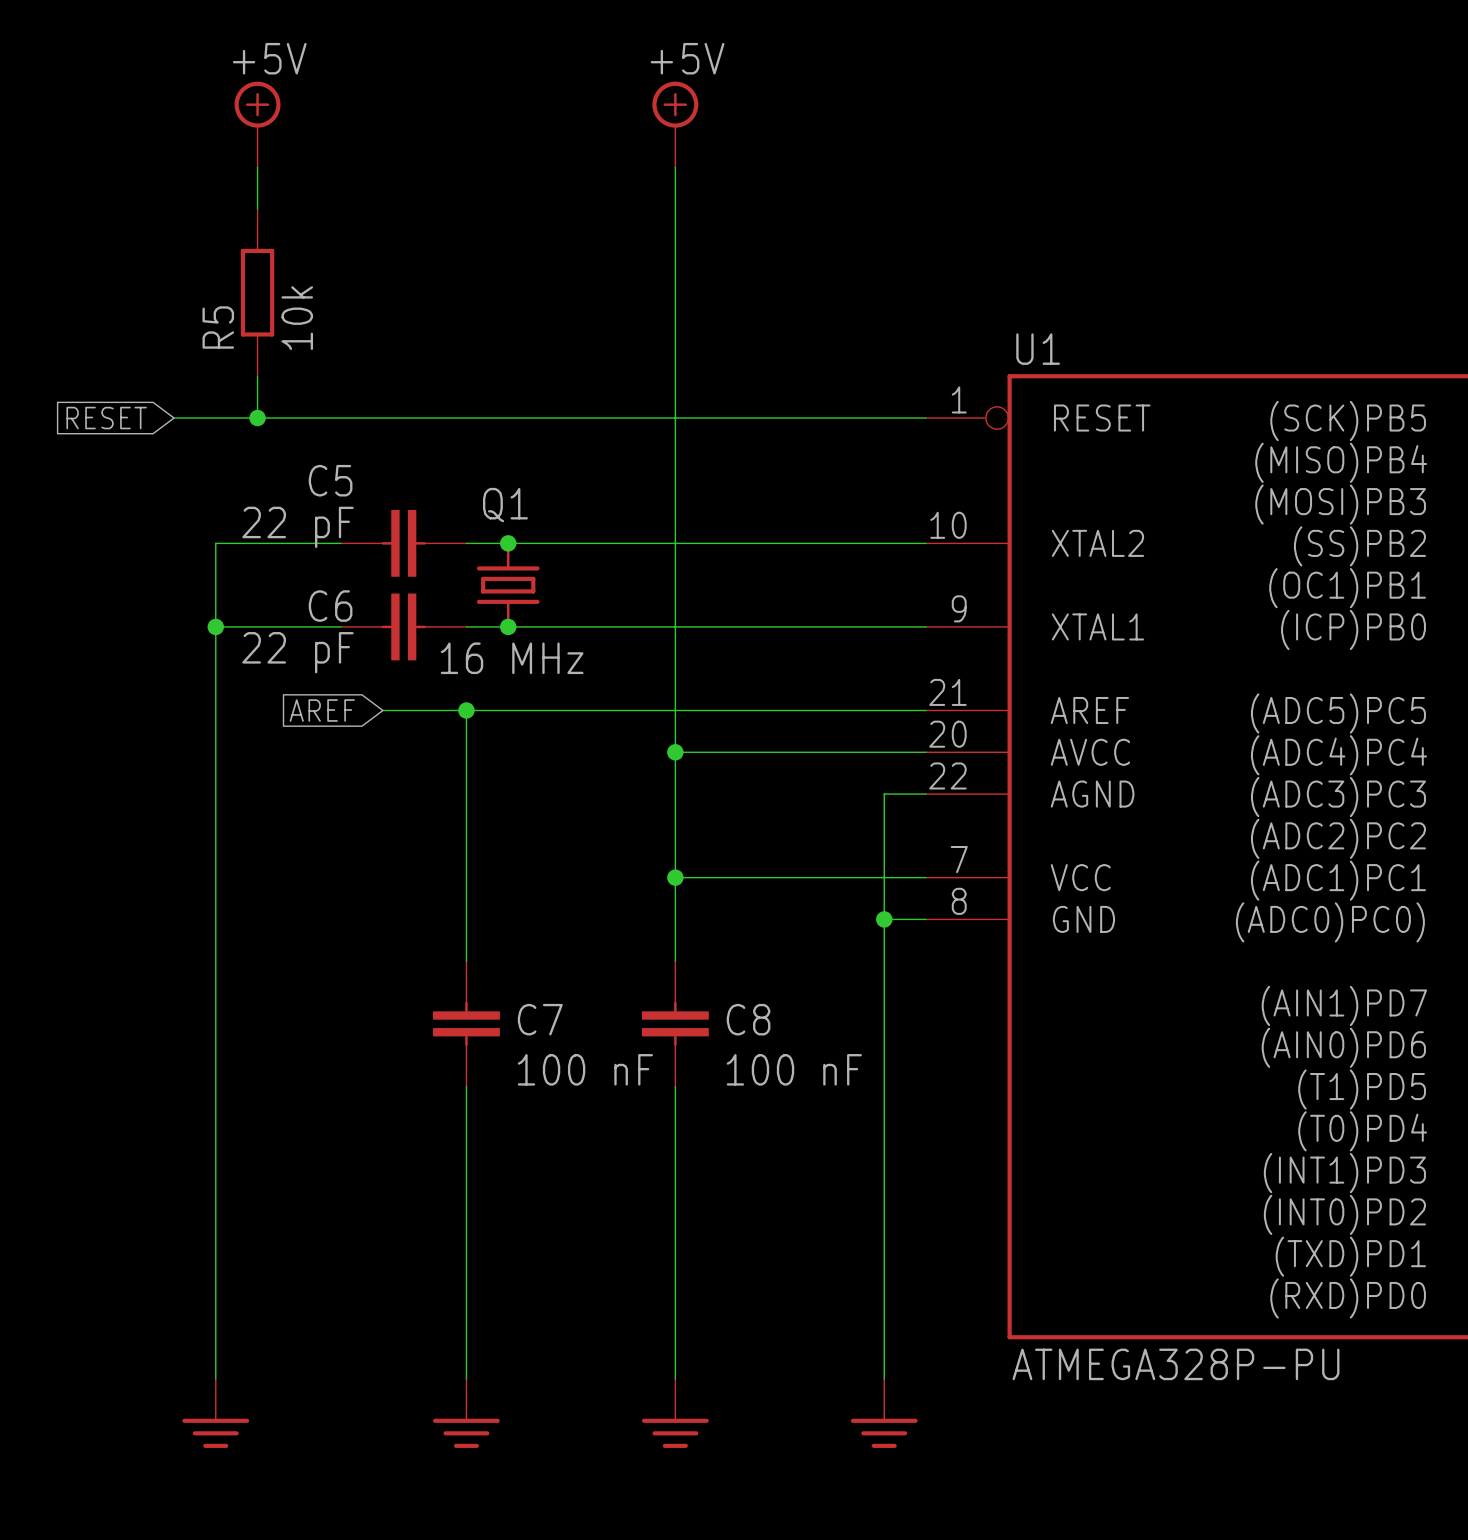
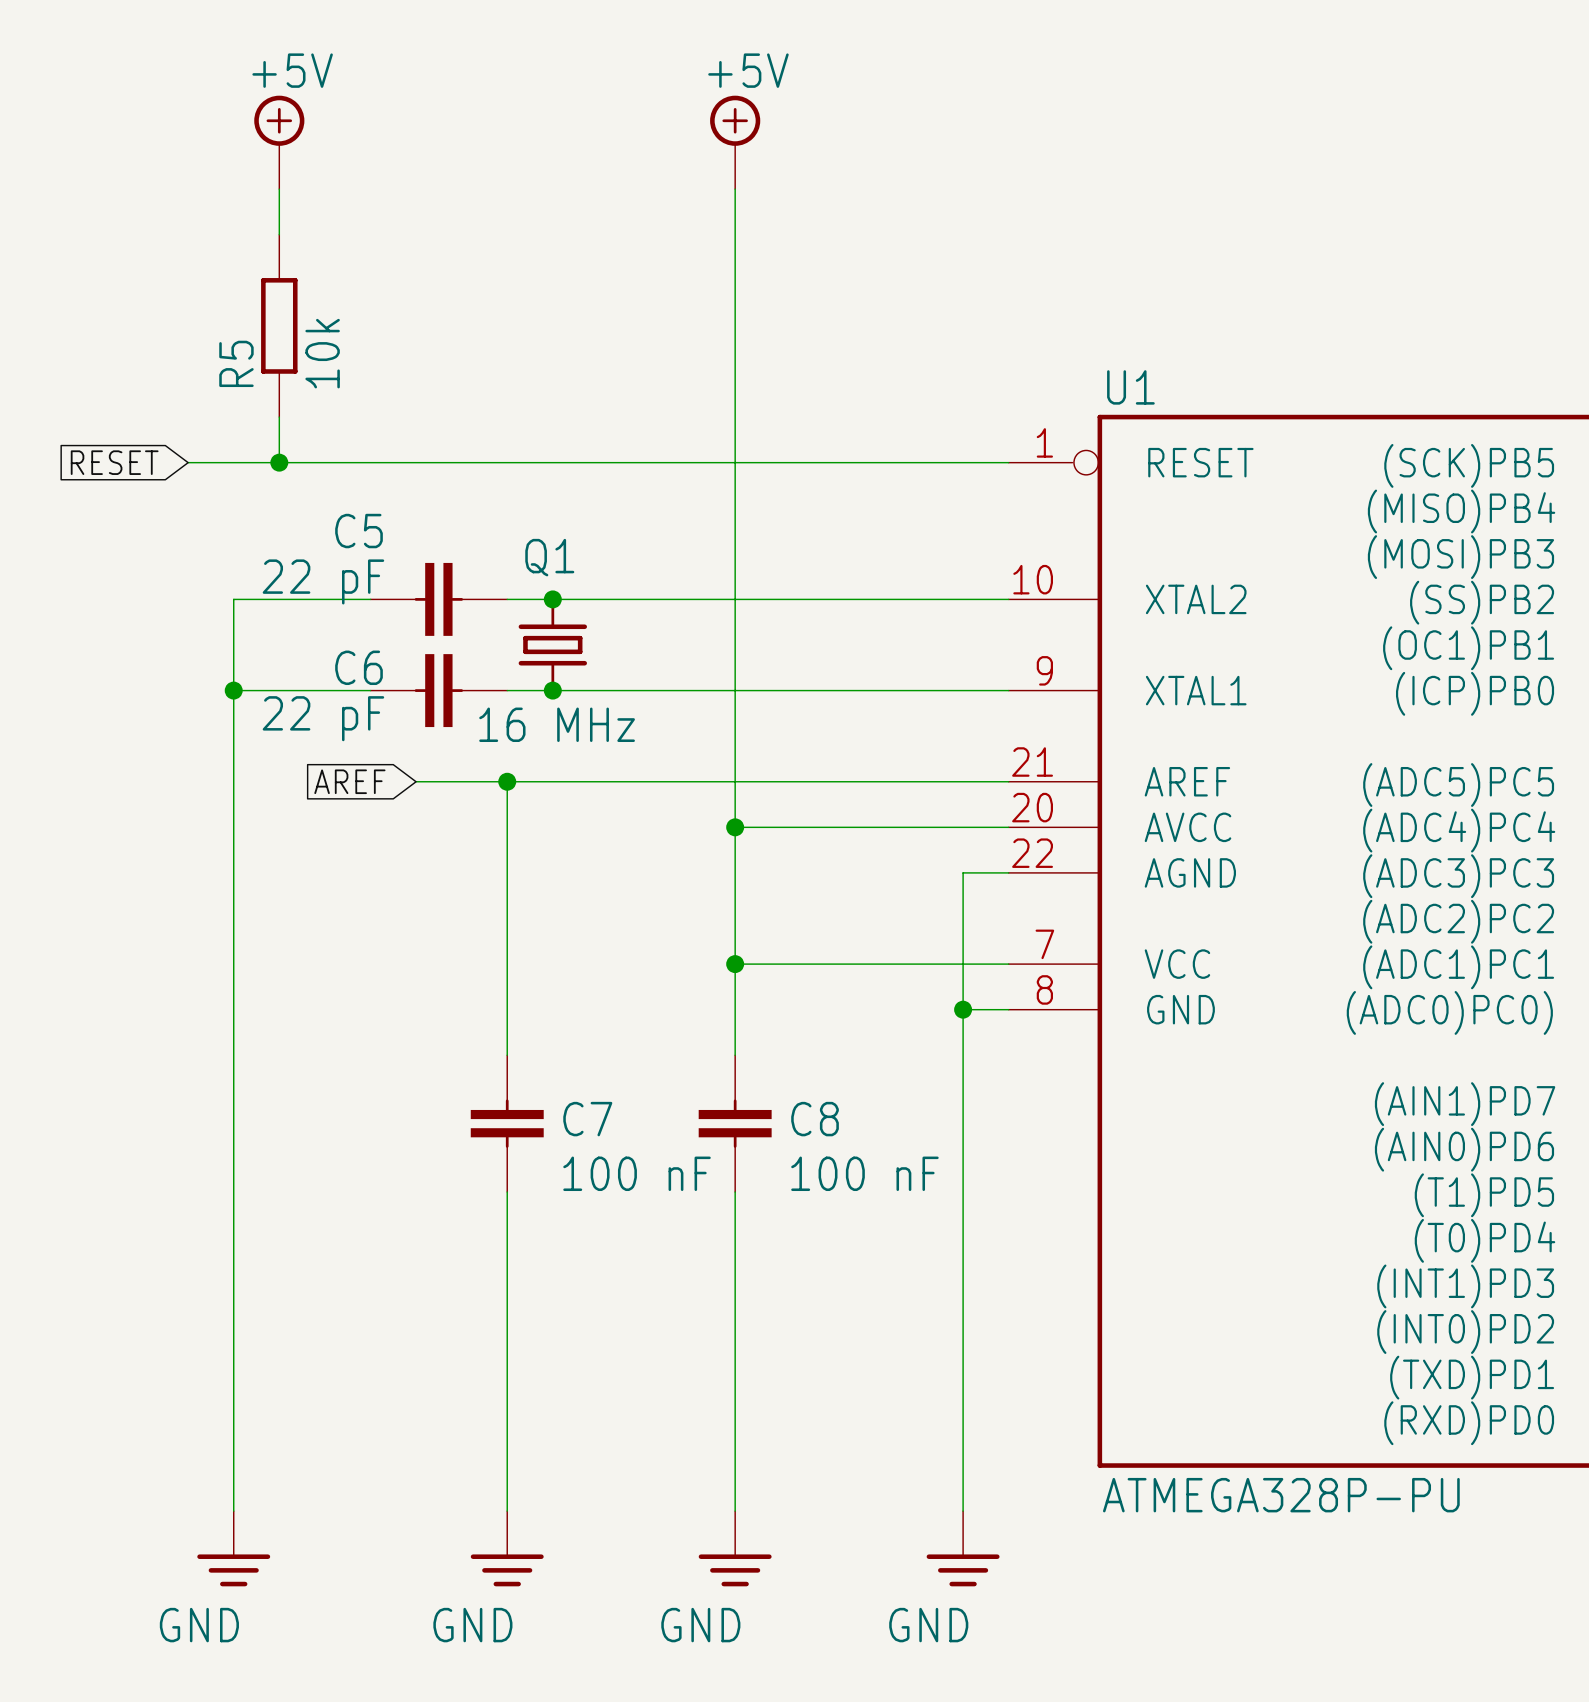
power symbol text: none -> GND (199, 1625)
power symbol text: none -> GND (472, 1625)
power symbol text: none -> GND (700, 1625)
power symbol text: none -> GND (928, 1625)

